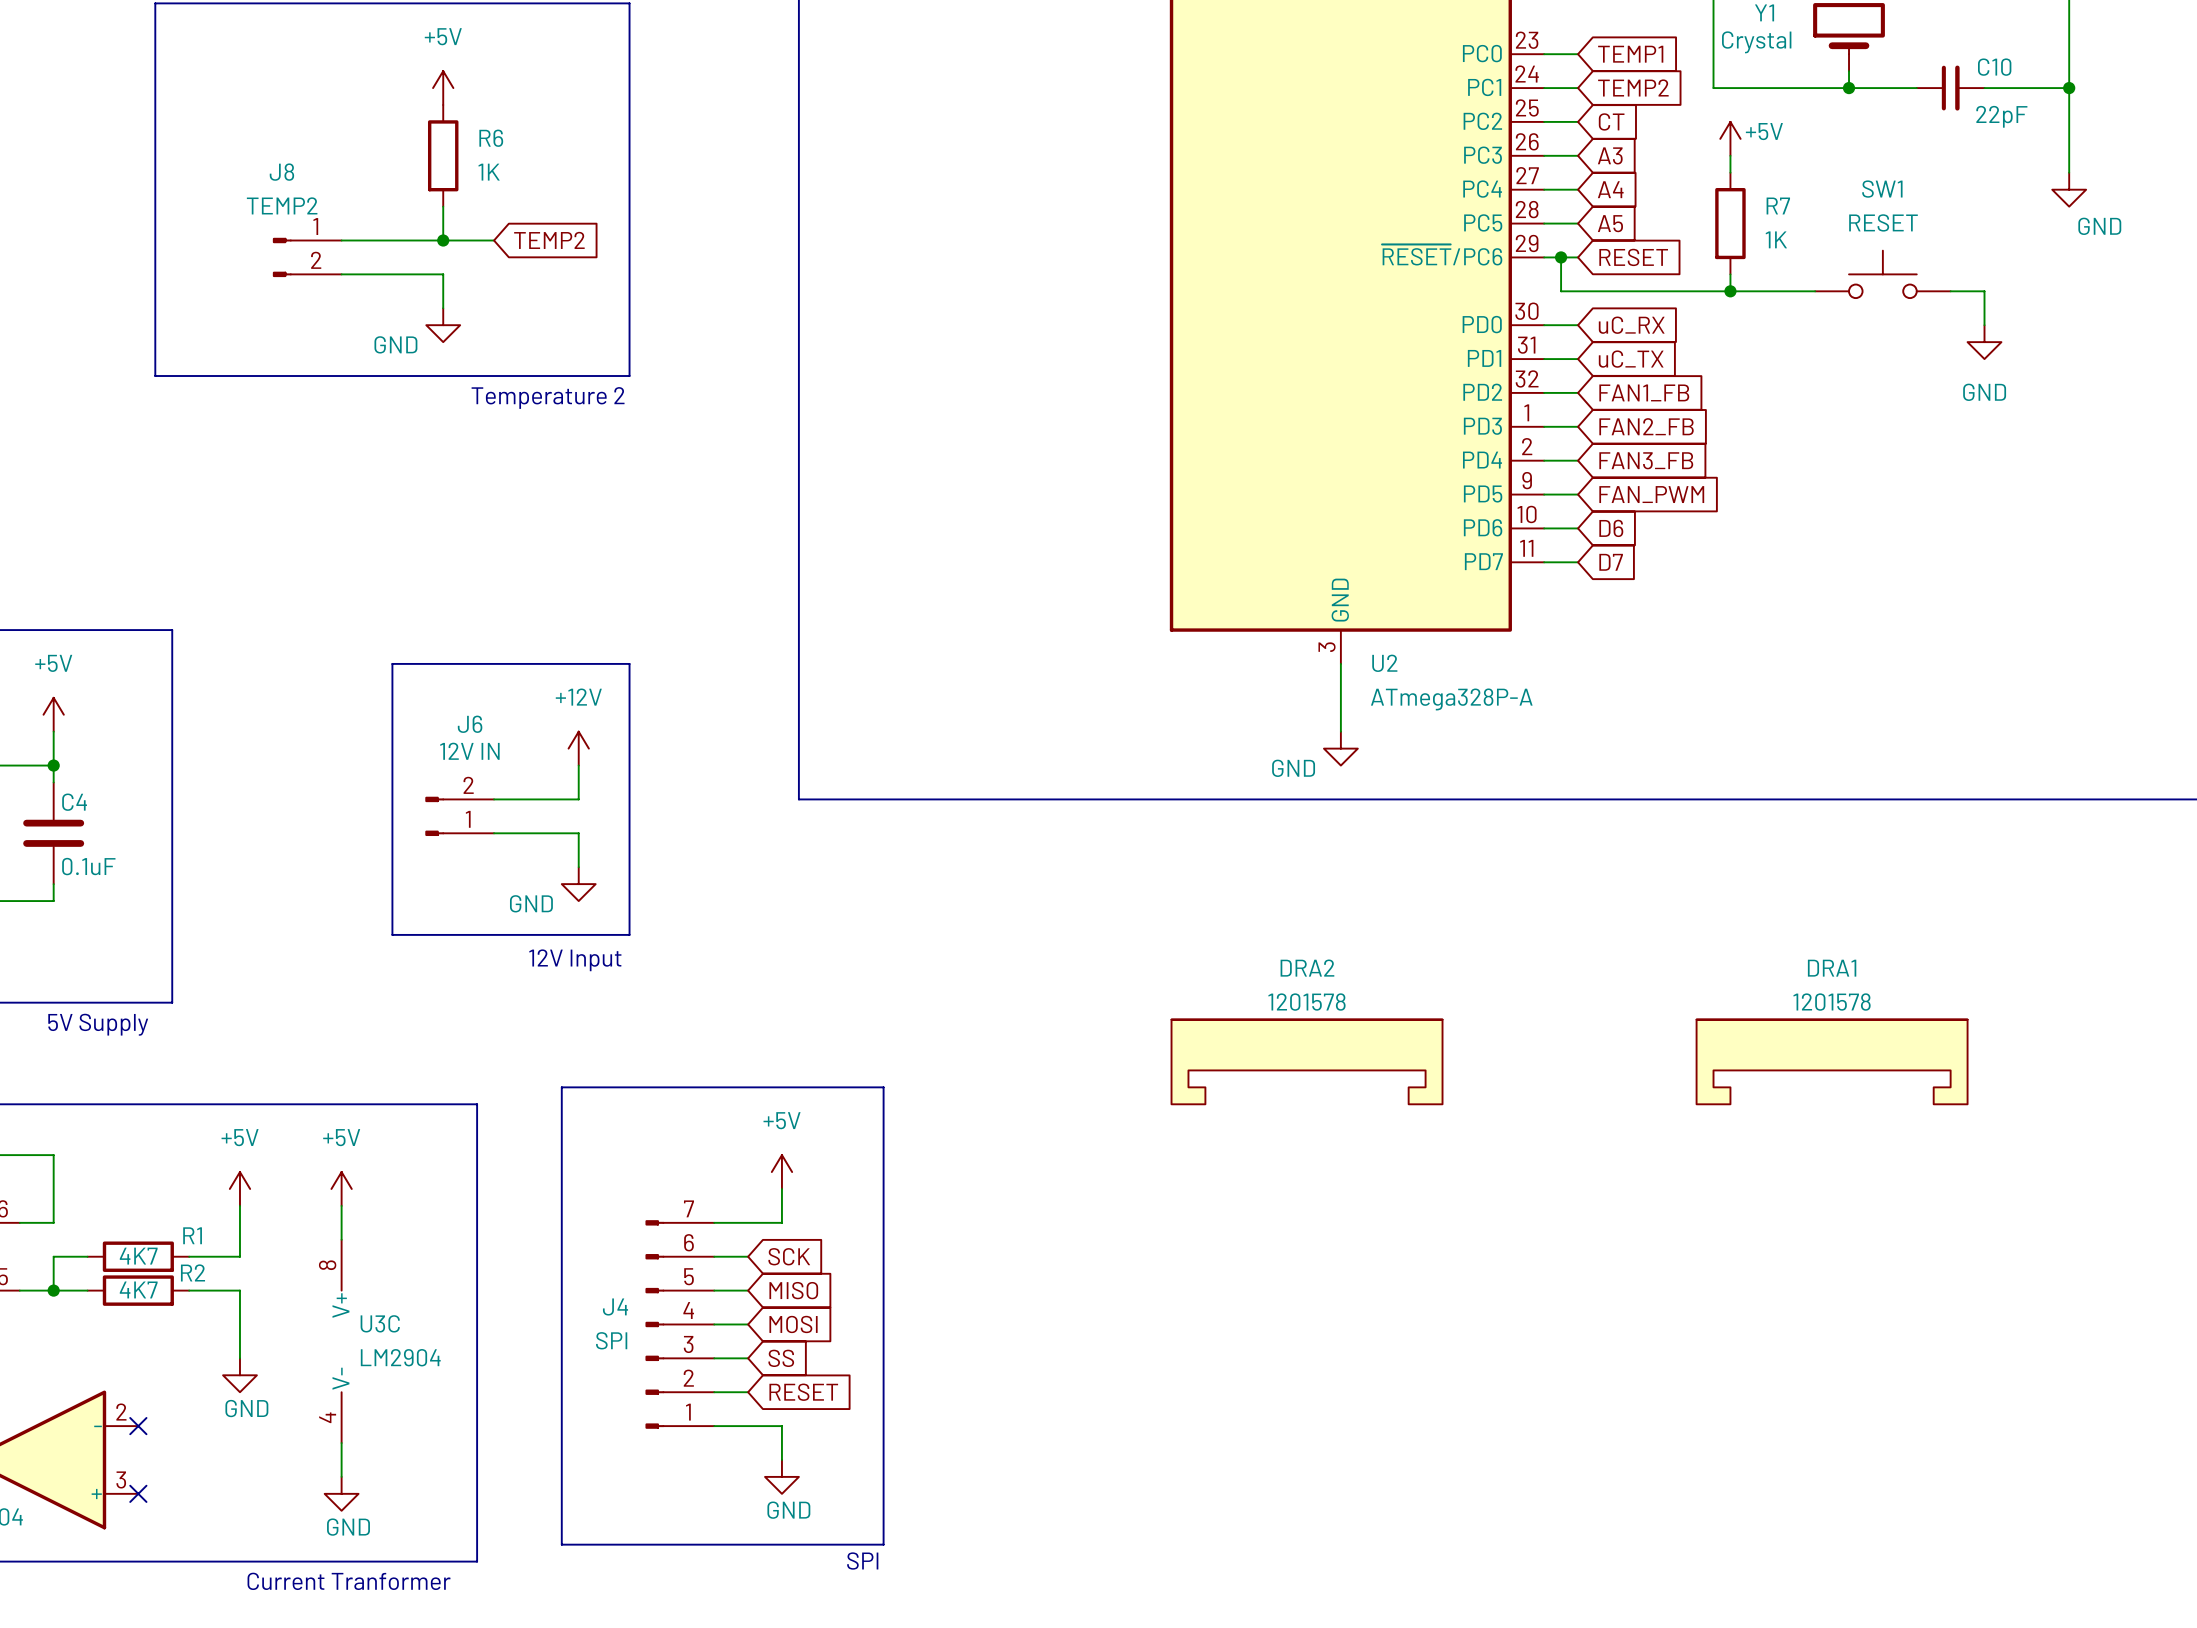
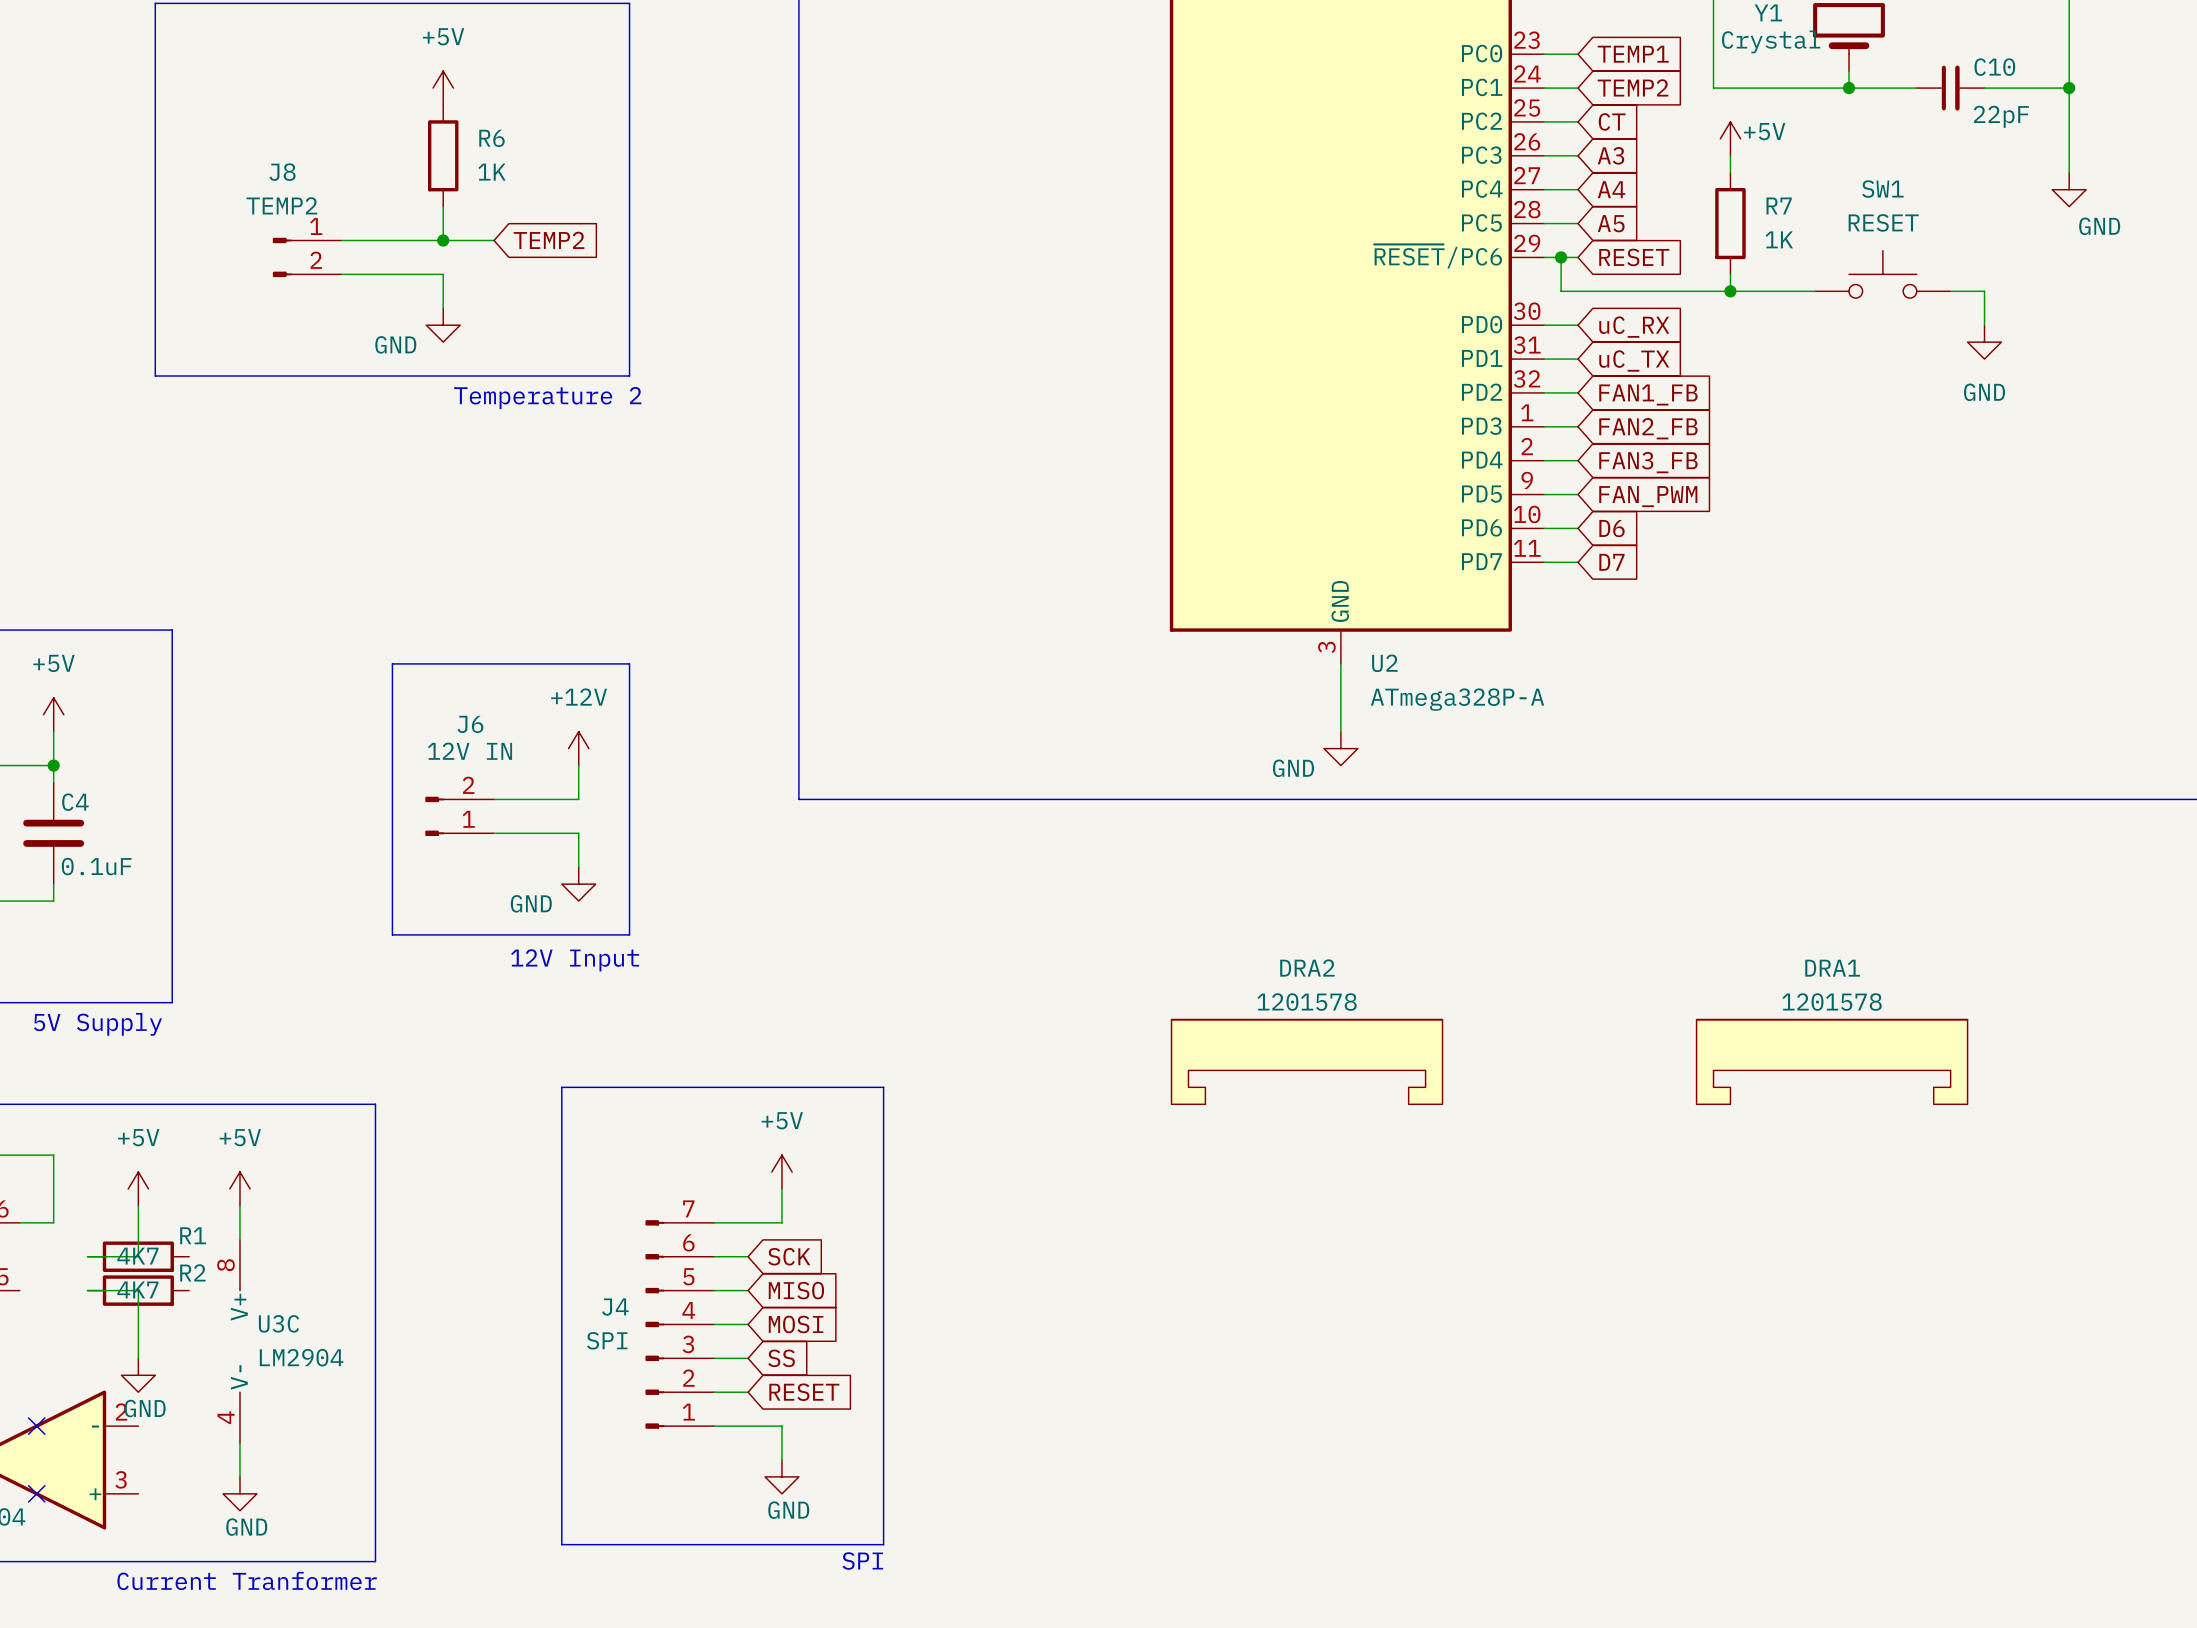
line: (375, 1104) (477, 1104) (477, 1561) (375, 1561) -> (375, 1104) (375, 1561)
power symbol position: +5V (341, 1188) -> +5V (138, 1188)
wire: (341, 1205) (341, 1239) -> none
wire: (239, 1239) (239, 1256) (189, 1256) -> none
wire: (87, 1256) (53, 1256) (53, 1290) -> (87, 1256) (138, 1256) (138, 1205)
wire: (19, 1290) (87, 1290) -> (138, 1358) (138, 1290) (87, 1290)
junction: (53, 1290) -> none
wire: (189, 1290) (239, 1290) (239, 1358) -> none
U3C position: (341, 1341) -> (239, 1341)
power symbol: none -> GND (138, 1375)
power symbol: GND (239, 1375) -> none
no-connect mark: none -> (36, 1426)
no-connect mark: (138, 1426) -> none
wire: (341, 1443) (341, 1476) -> (239, 1443) (239, 1476)
no-connect mark: none -> (36, 1493)
no-connect mark: (138, 1493) -> none
power symbol: none -> GND (239, 1493)
power symbol: GND (341, 1493) -> none
text position: Current Tranformer (349, 1581) -> Current Tranformer (247, 1580)

